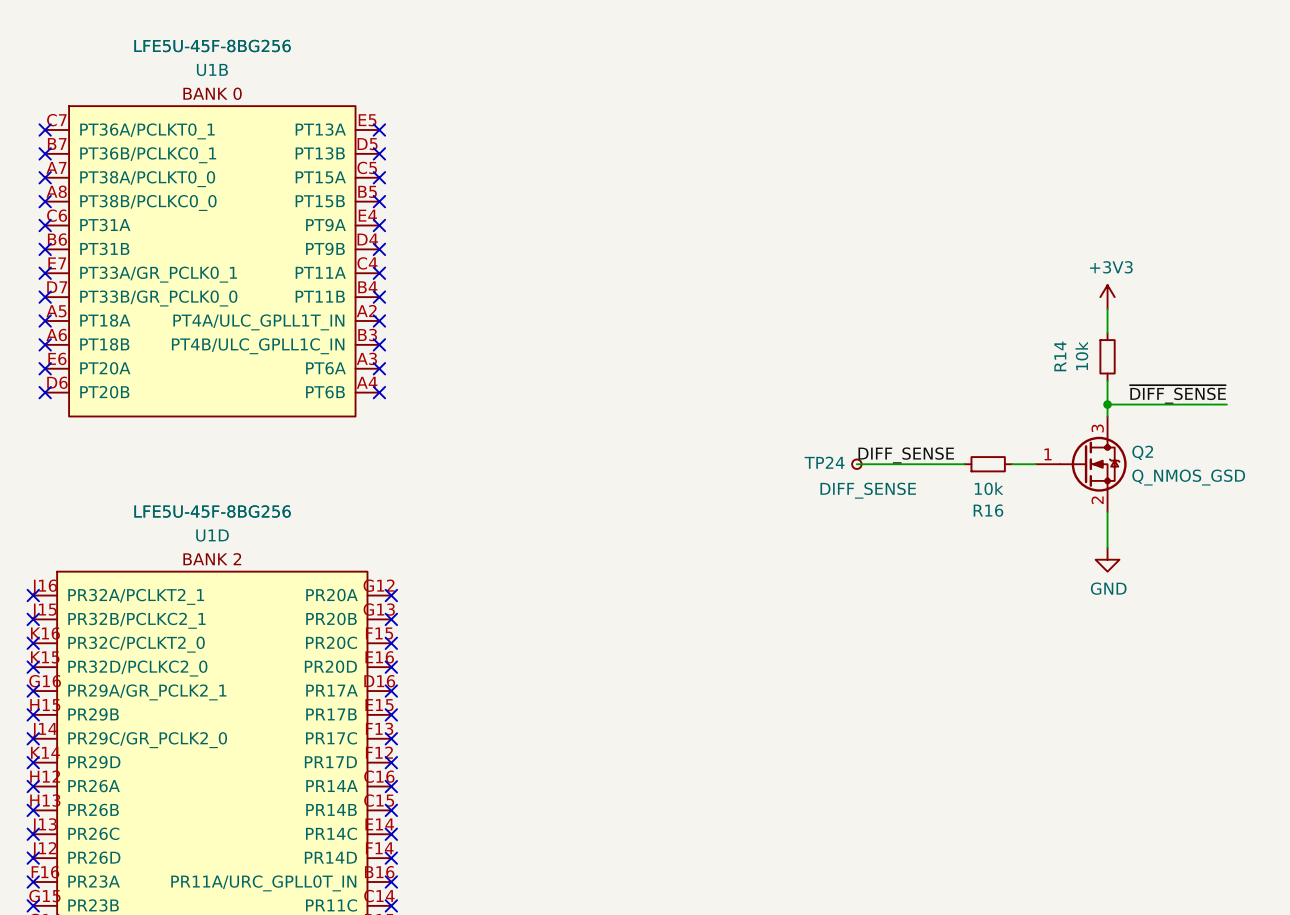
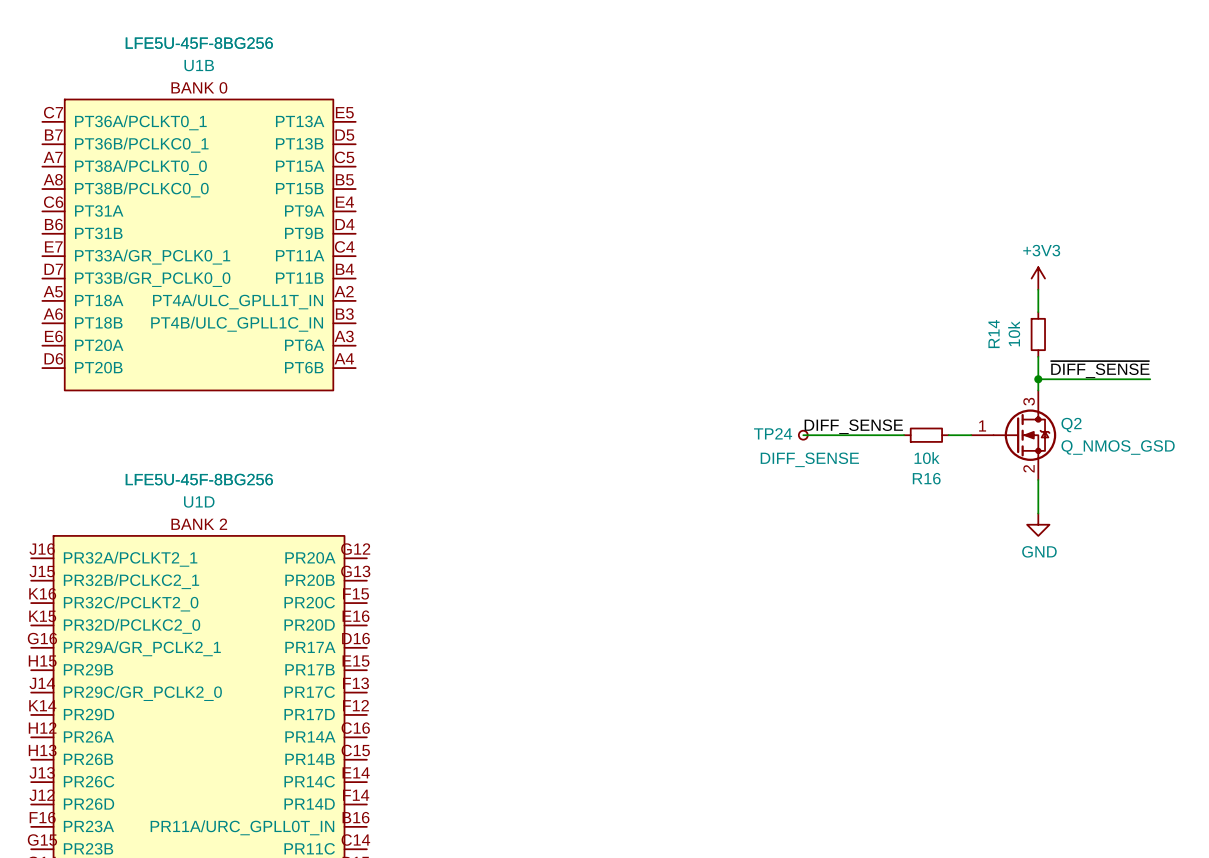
no-connect mark: (45, 130) -> none
no-connect mark: (379, 130) -> none
no-connect mark: (45, 153) -> none
no-connect mark: (379, 153) -> none
no-connect mark: (45, 177) -> none
no-connect mark: (379, 177) -> none
no-connect mark: (45, 201) -> none
no-connect mark: (379, 201) -> none
no-connect mark: (45, 225) -> none
no-connect mark: (379, 225) -> none
no-connect mark: (45, 249) -> none
no-connect mark: (379, 249) -> none
no-connect mark: (45, 273) -> none
no-connect mark: (379, 273) -> none
no-connect mark: (45, 297) -> none
no-connect mark: (379, 297) -> none
no-connect mark: (45, 320) -> none
no-connect mark: (379, 320) -> none
no-connect mark: (45, 344) -> none
no-connect mark: (379, 344) -> none
no-connect mark: (45, 368) -> none
no-connect mark: (379, 368) -> none
no-connect mark: (45, 392) -> none
no-connect mark: (379, 392) -> none
no-connect mark: (33, 595) -> none
no-connect mark: (391, 595) -> none
no-connect mark: (33, 619) -> none
no-connect mark: (391, 619) -> none
no-connect mark: (33, 643) -> none
no-connect mark: (391, 643) -> none
no-connect mark: (33, 667) -> none
no-connect mark: (391, 667) -> none
no-connect mark: (33, 691) -> none
no-connect mark: (391, 691) -> none
no-connect mark: (33, 714) -> none
no-connect mark: (391, 714) -> none
no-connect mark: (33, 738) -> none
no-connect mark: (391, 738) -> none
no-connect mark: (33, 762) -> none
no-connect mark: (391, 762) -> none
no-connect mark: (33, 786) -> none
no-connect mark: (391, 786) -> none
no-connect mark: (33, 810) -> none
no-connect mark: (391, 810) -> none
no-connect mark: (33, 834) -> none
no-connect mark: (391, 834) -> none
no-connect mark: (33, 858) -> none
no-connect mark: (391, 858) -> none
no-connect mark: (33, 882) -> none
no-connect mark: (391, 882) -> none
no-connect mark: (33, 905) -> none
no-connect mark: (391, 905) -> none

